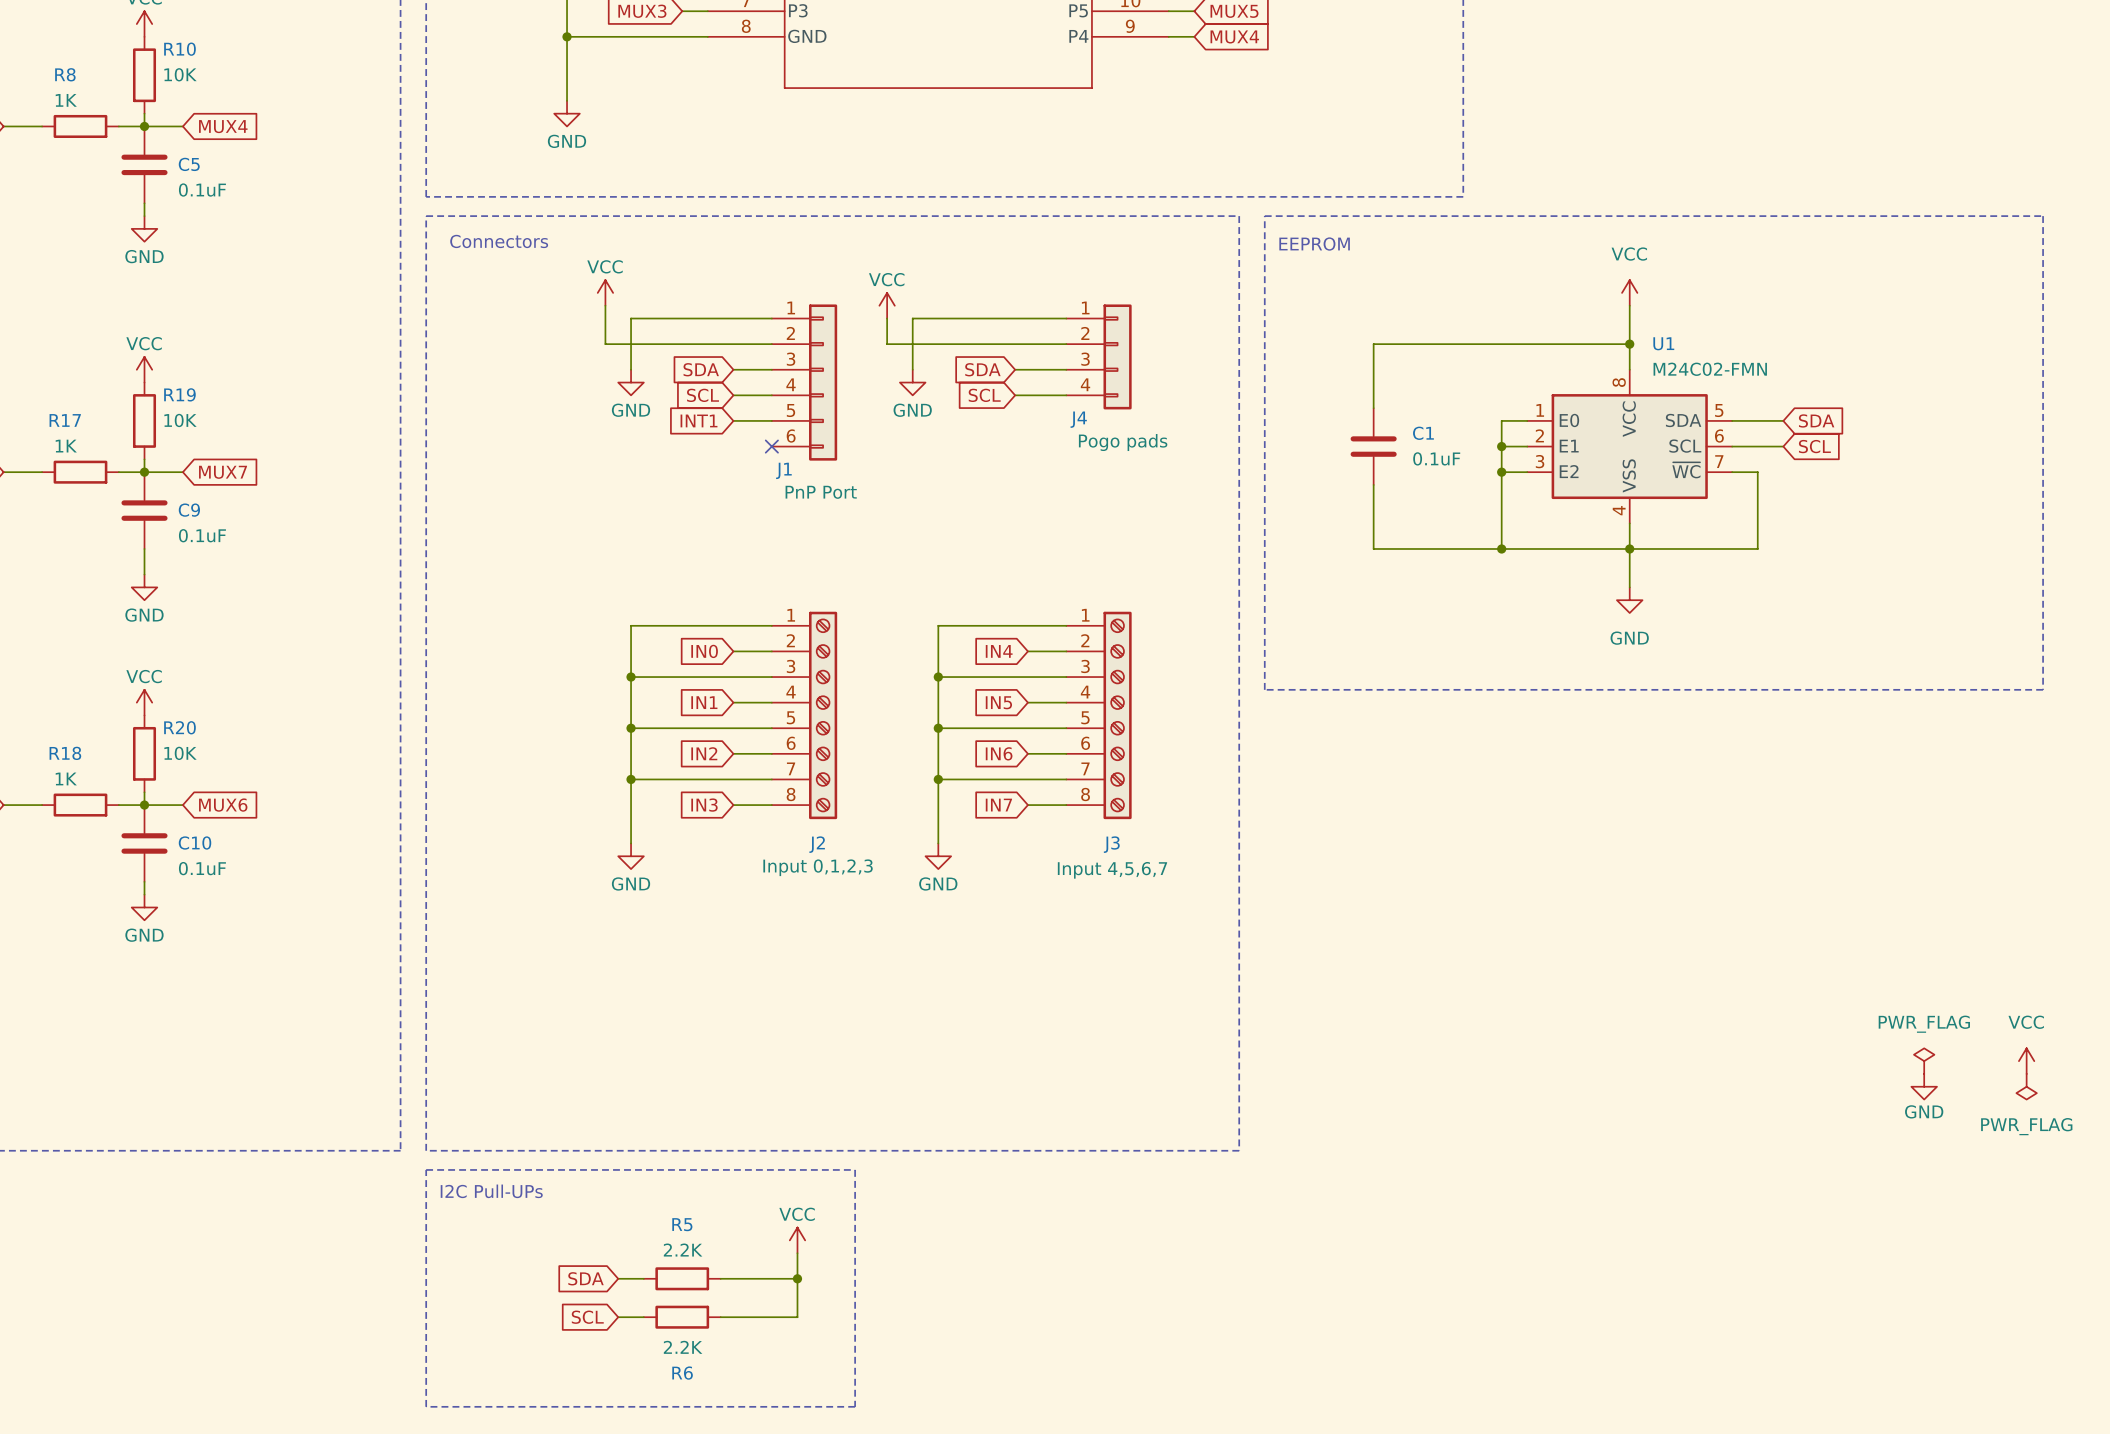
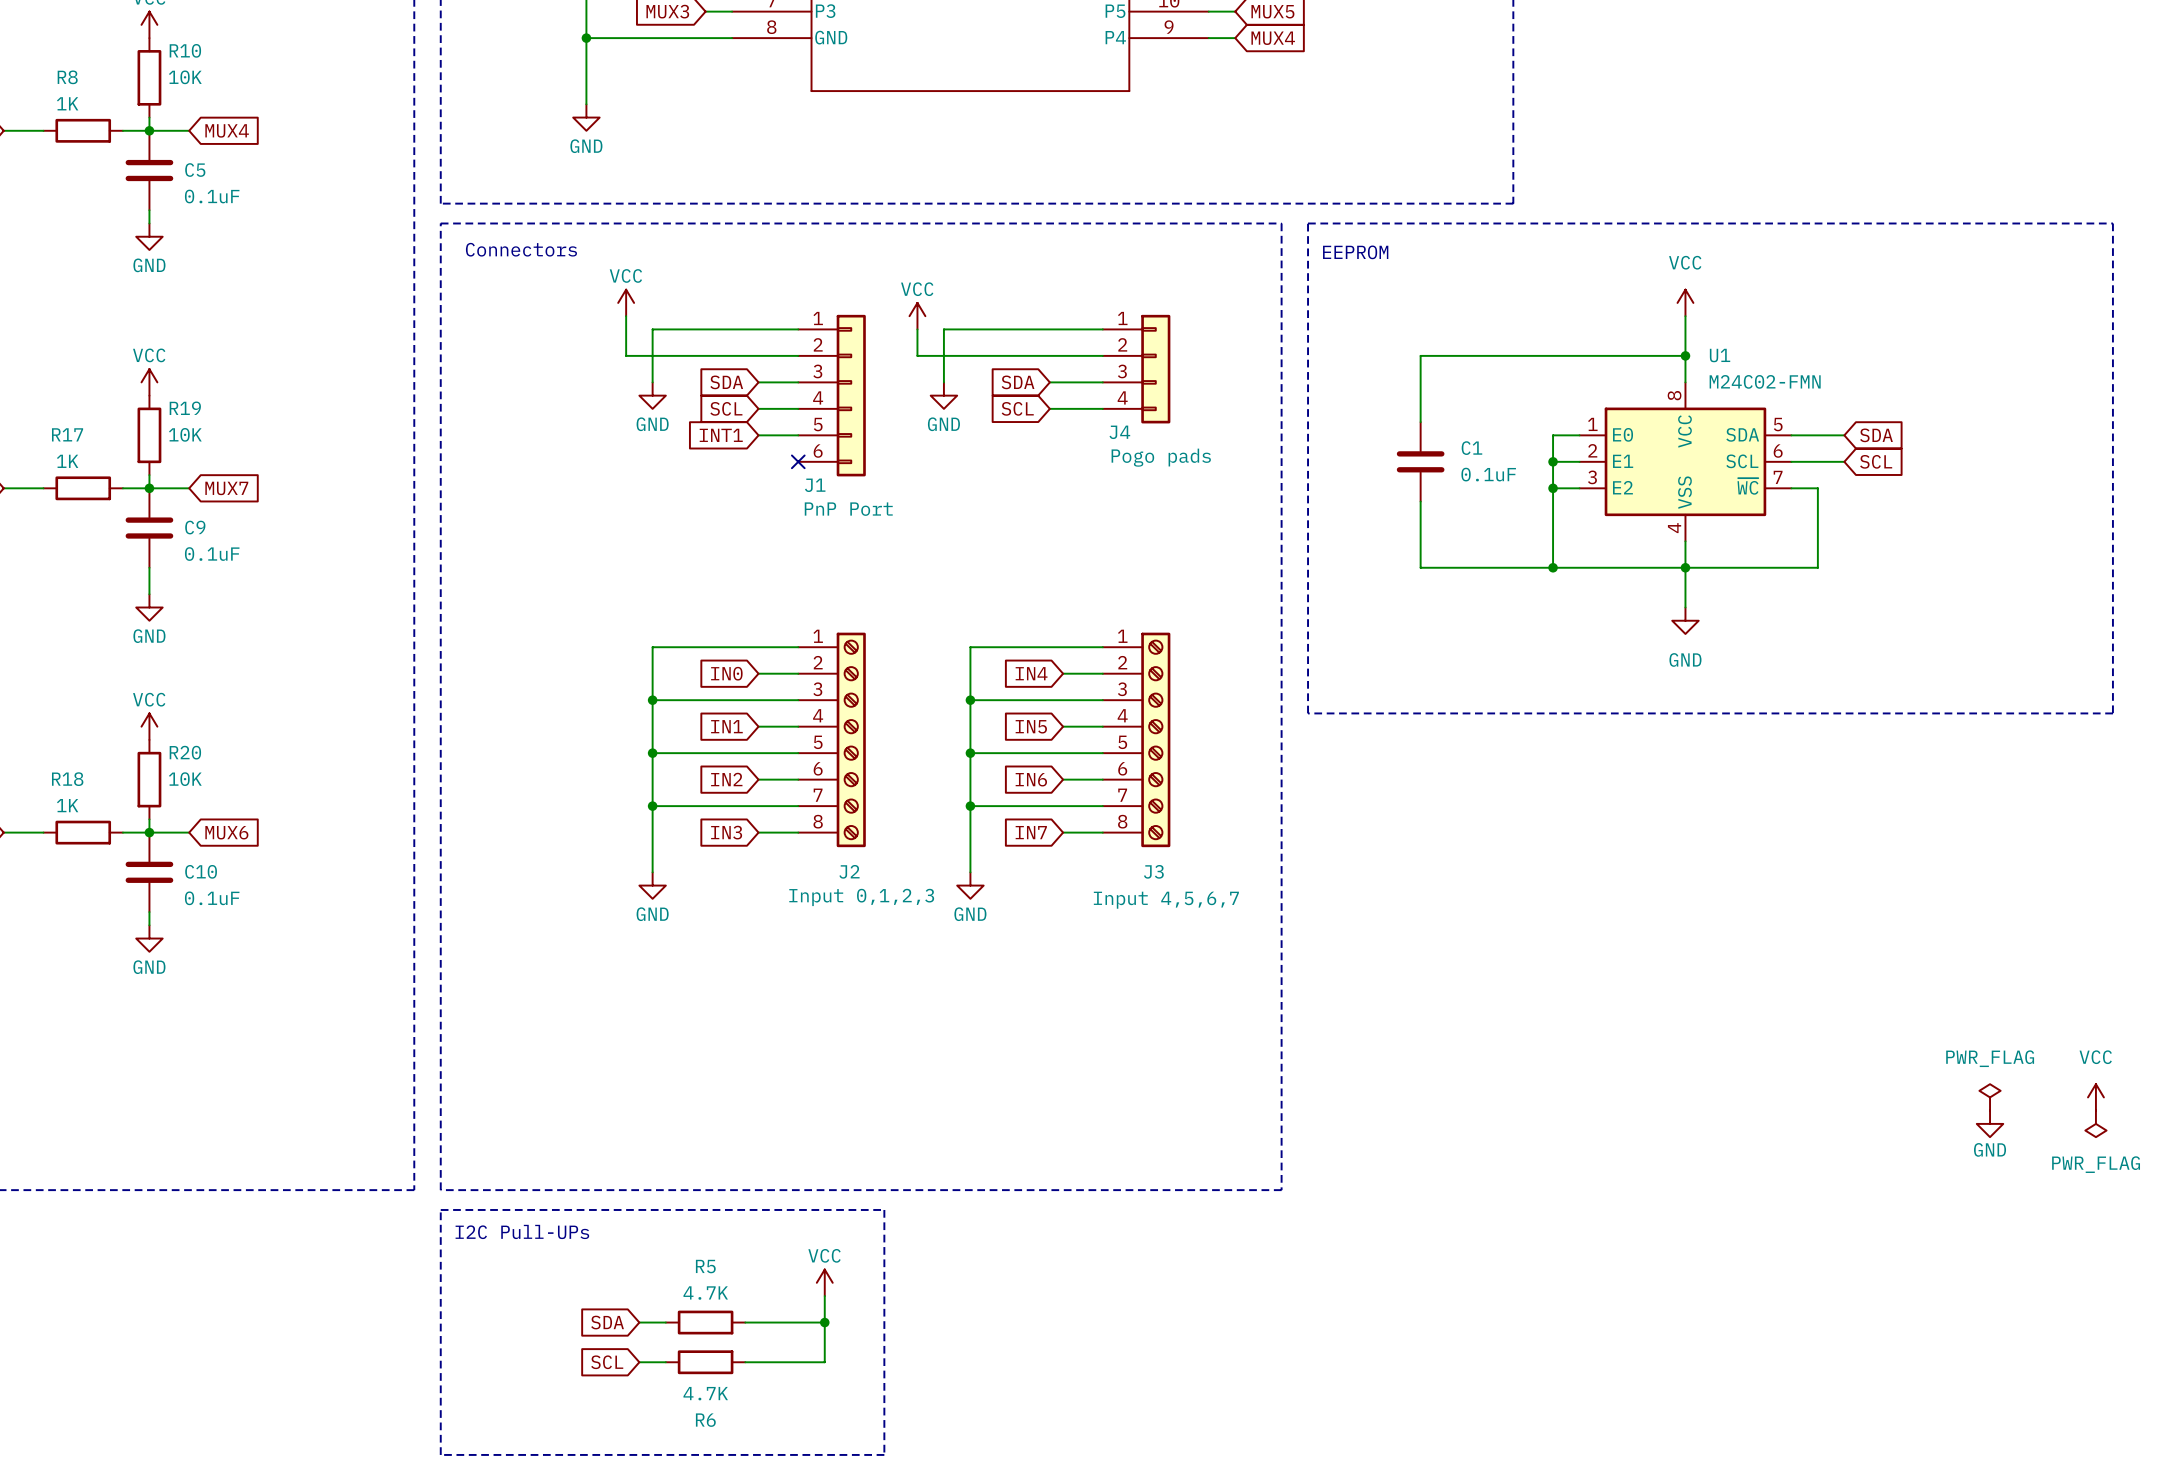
R5 value: 2.2K (683, 1250) -> 4.7K (705, 1293)
R6 value: 2.2K (683, 1347) -> 4.7K (705, 1393)

